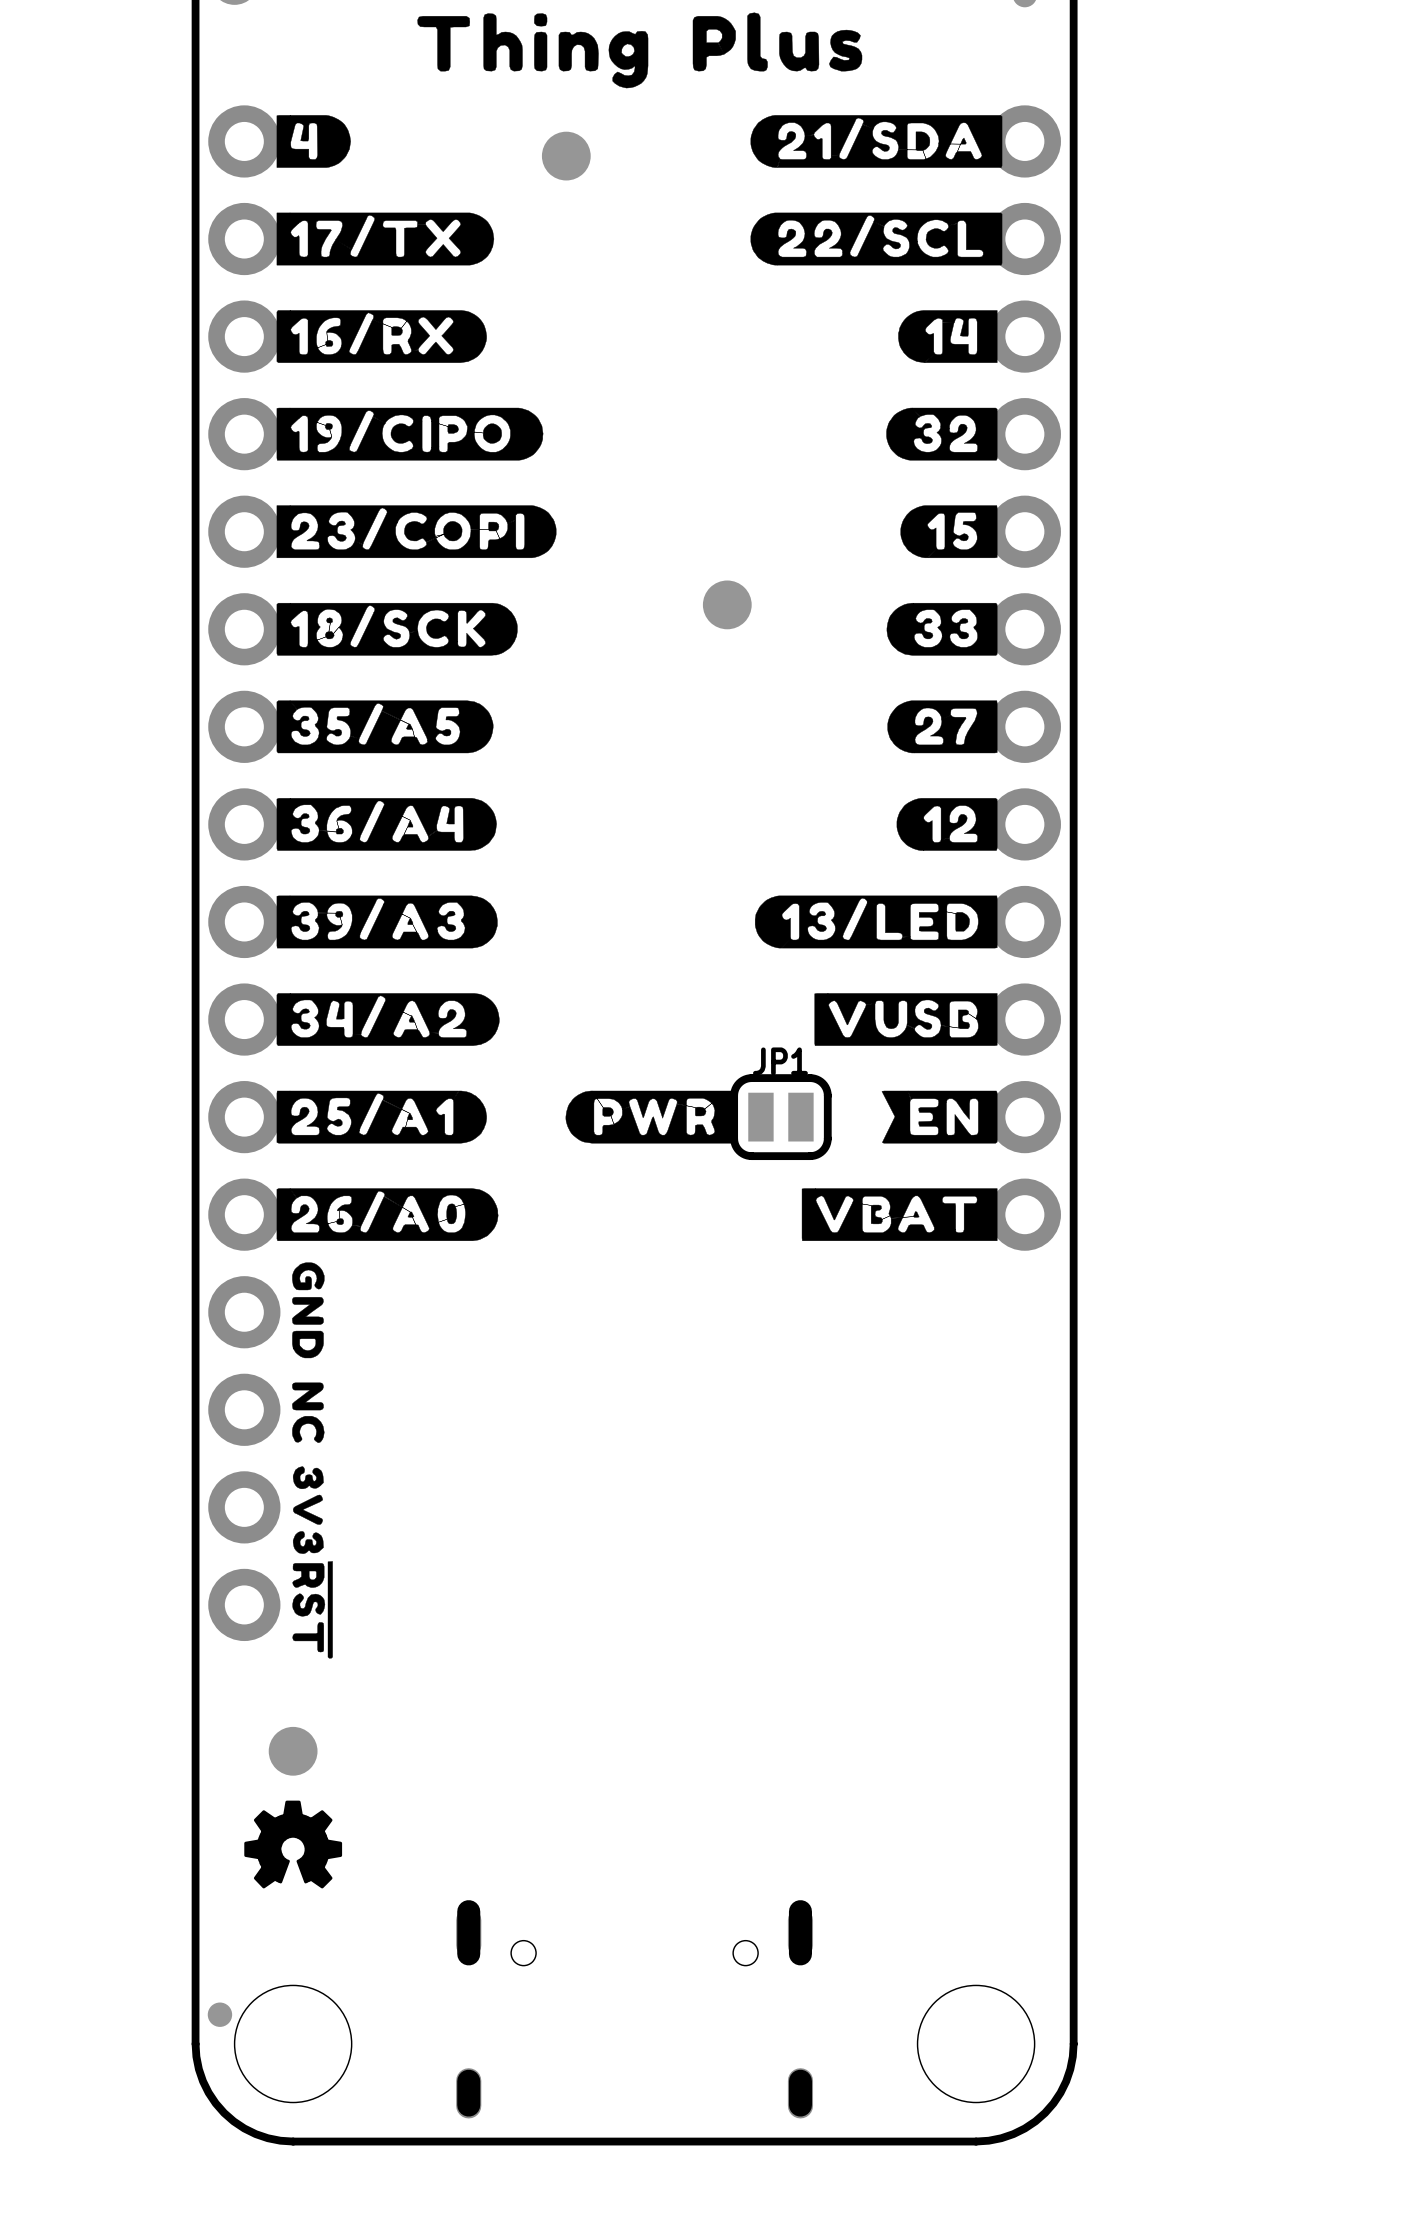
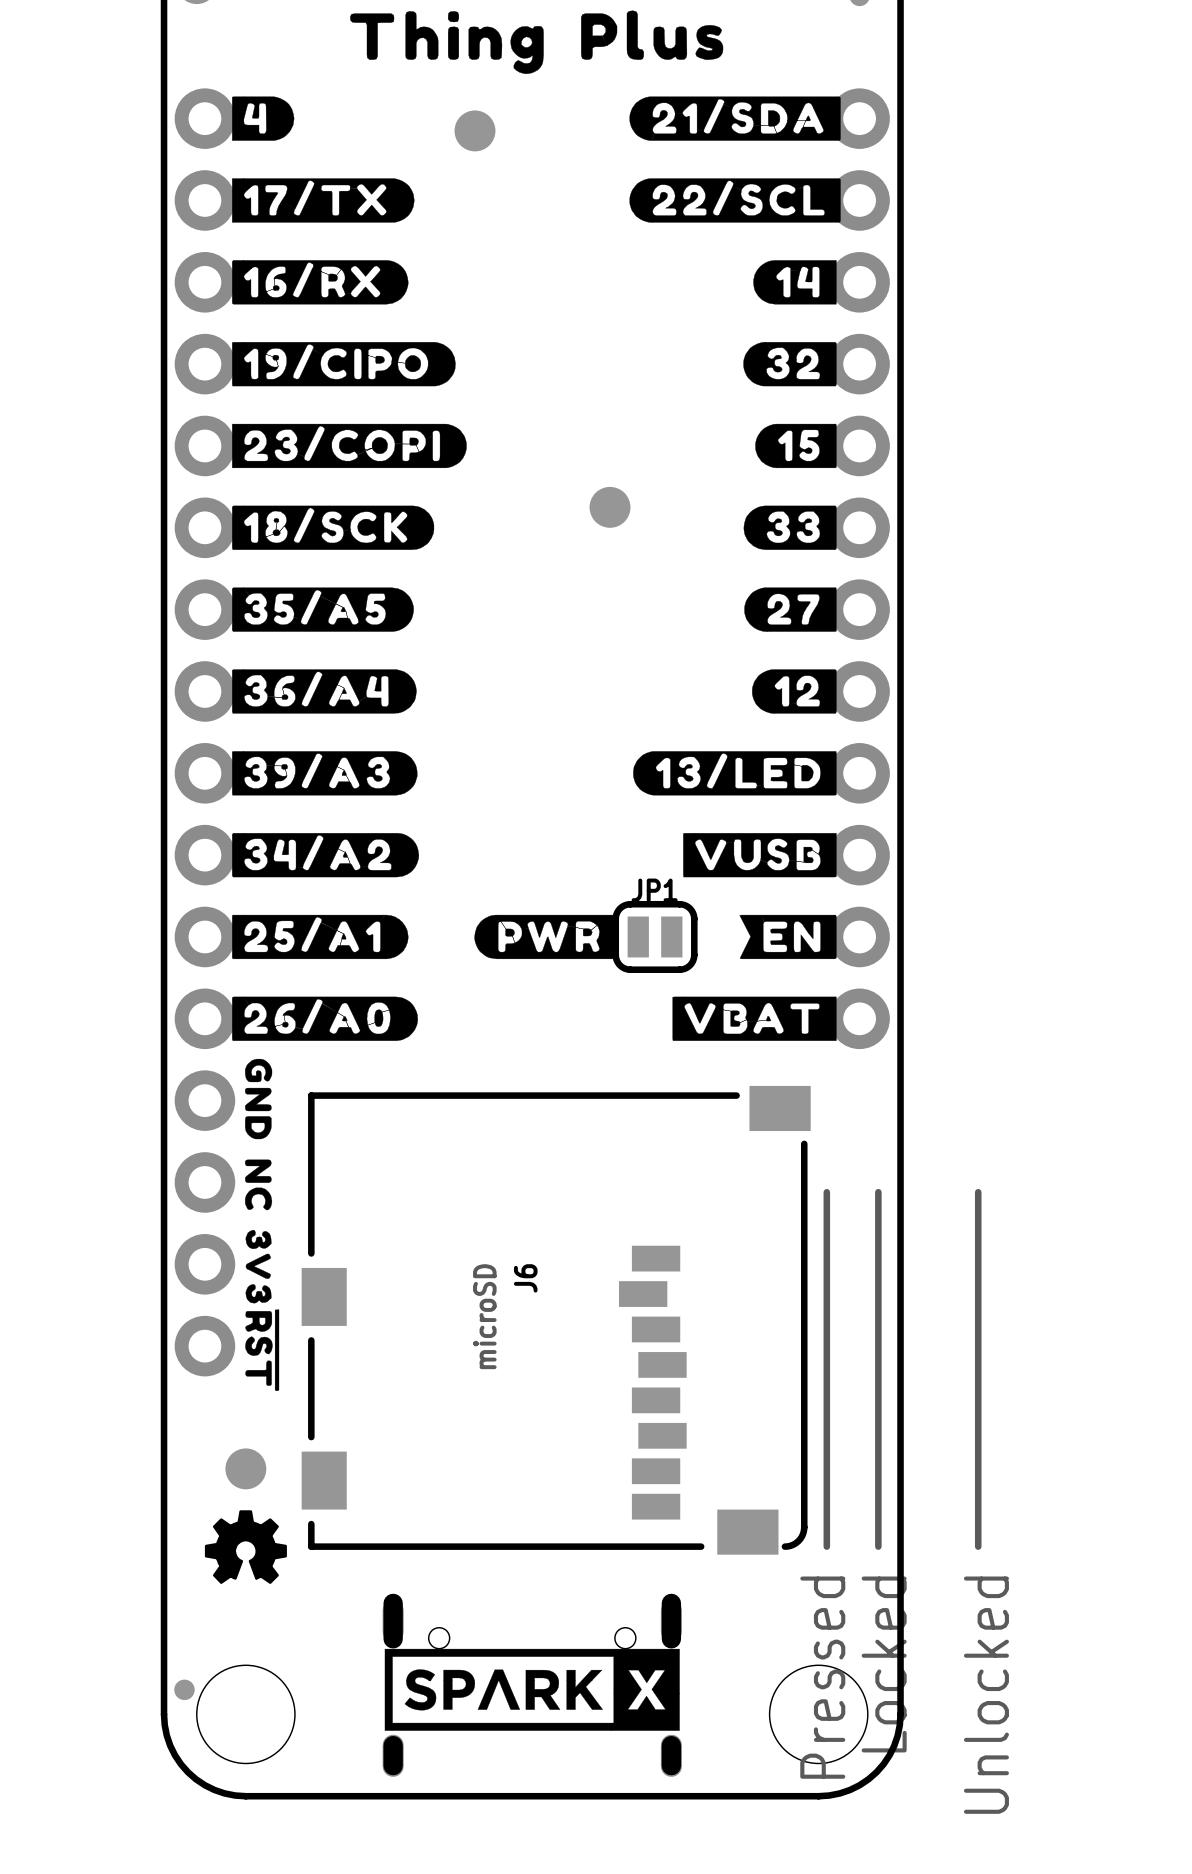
J6: none -> microSD (641, 1320)
drawing: none -> [384, 1648, 680, 1731]

